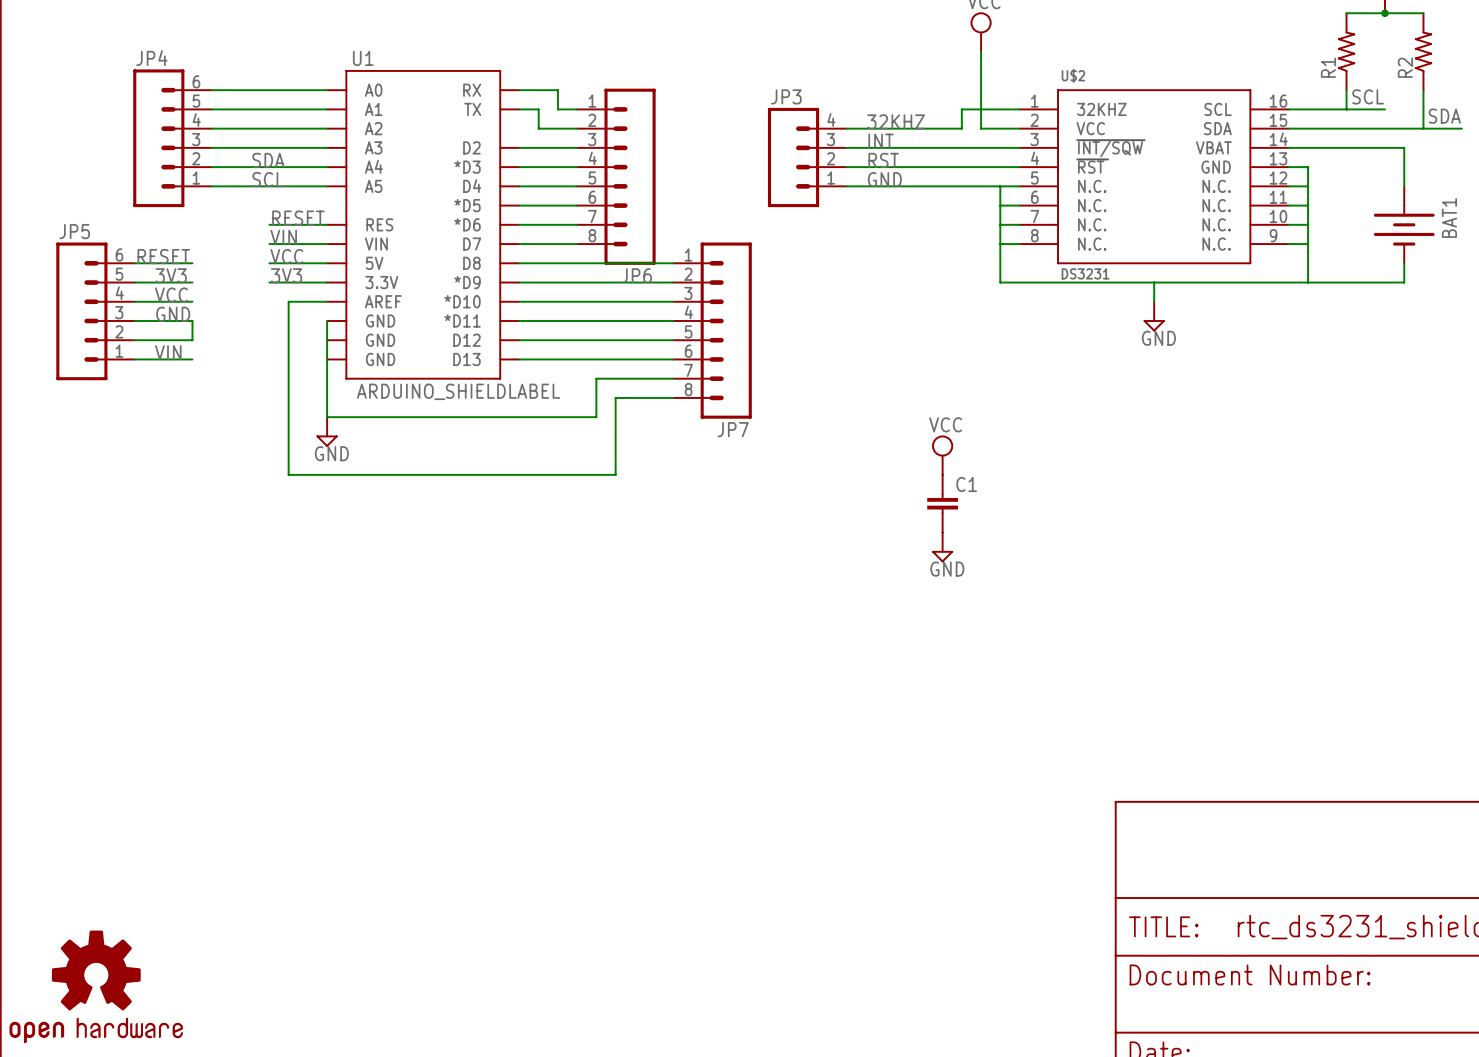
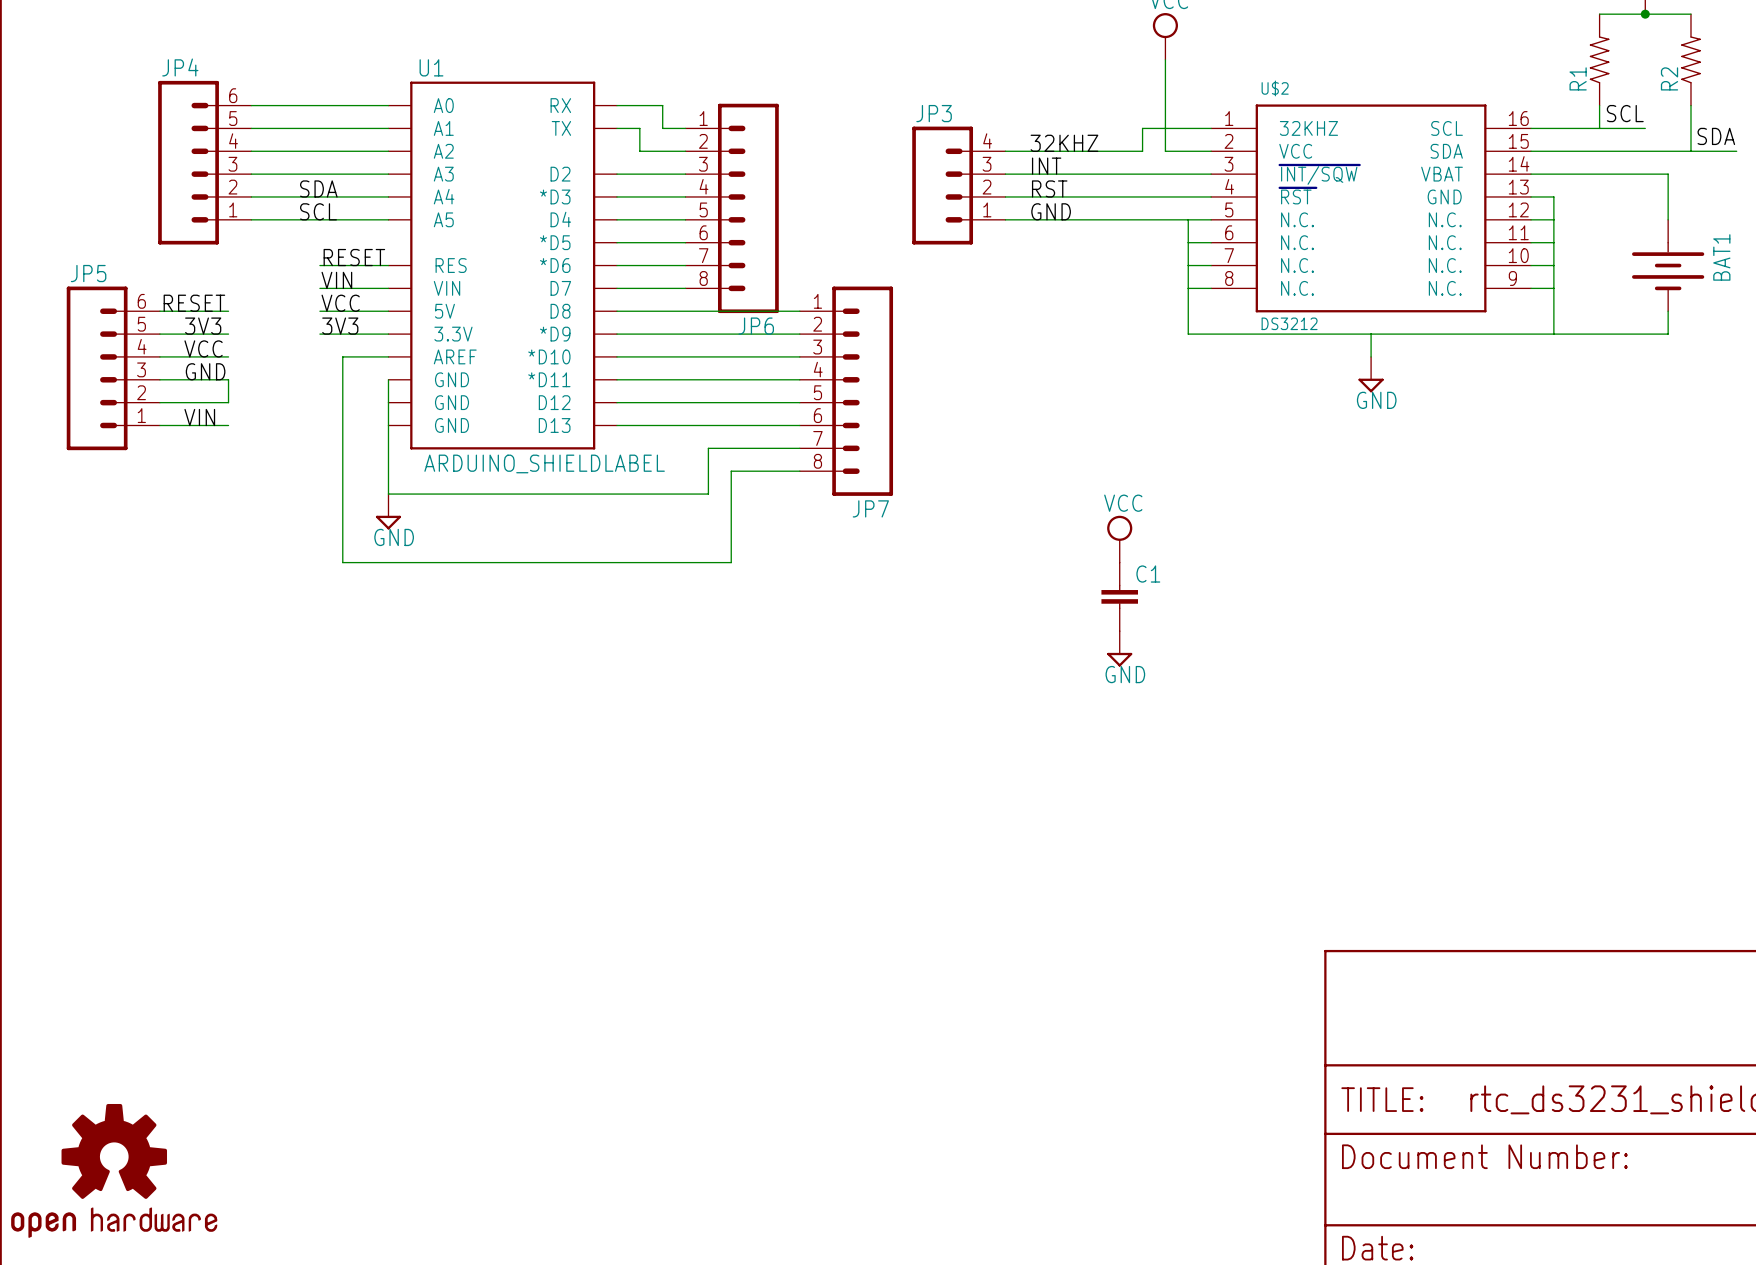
U$2 value: DS3231 (1085, 273) -> DS3212 (1289, 323)

